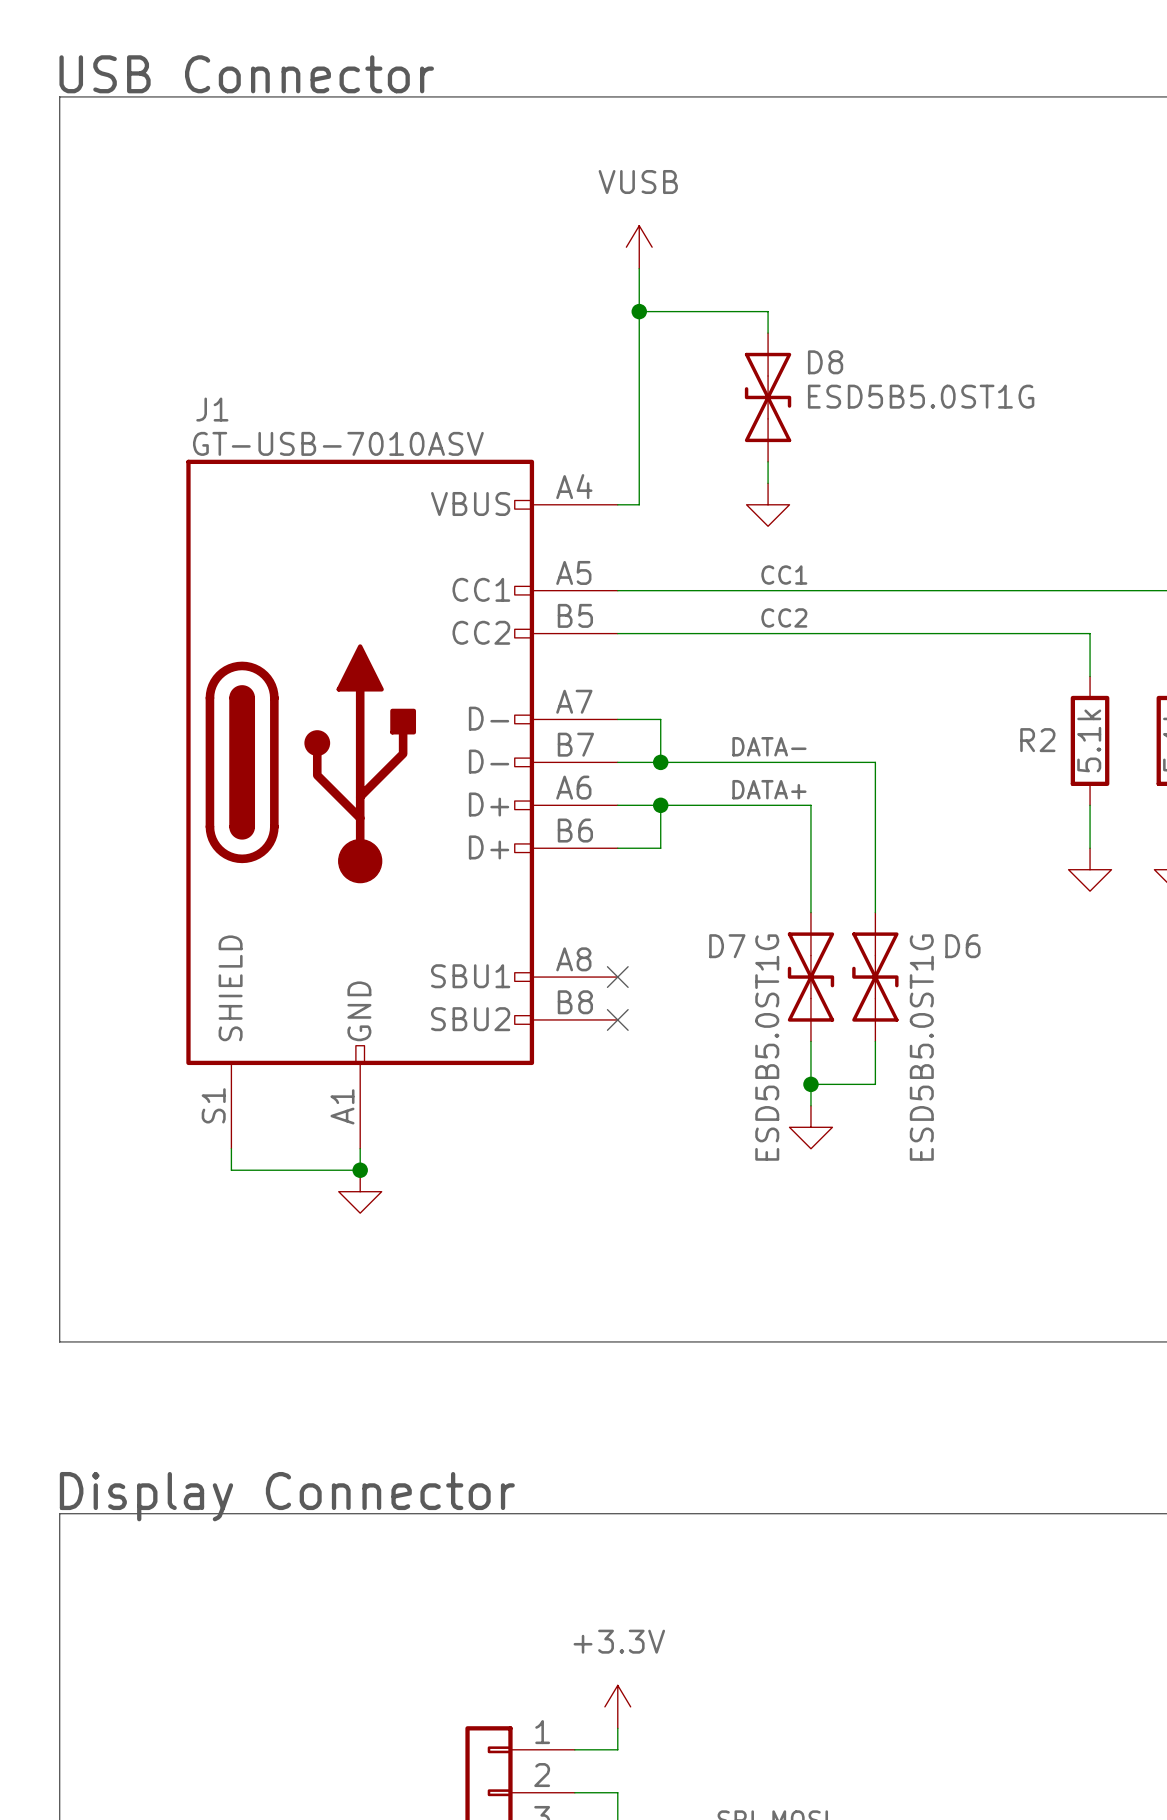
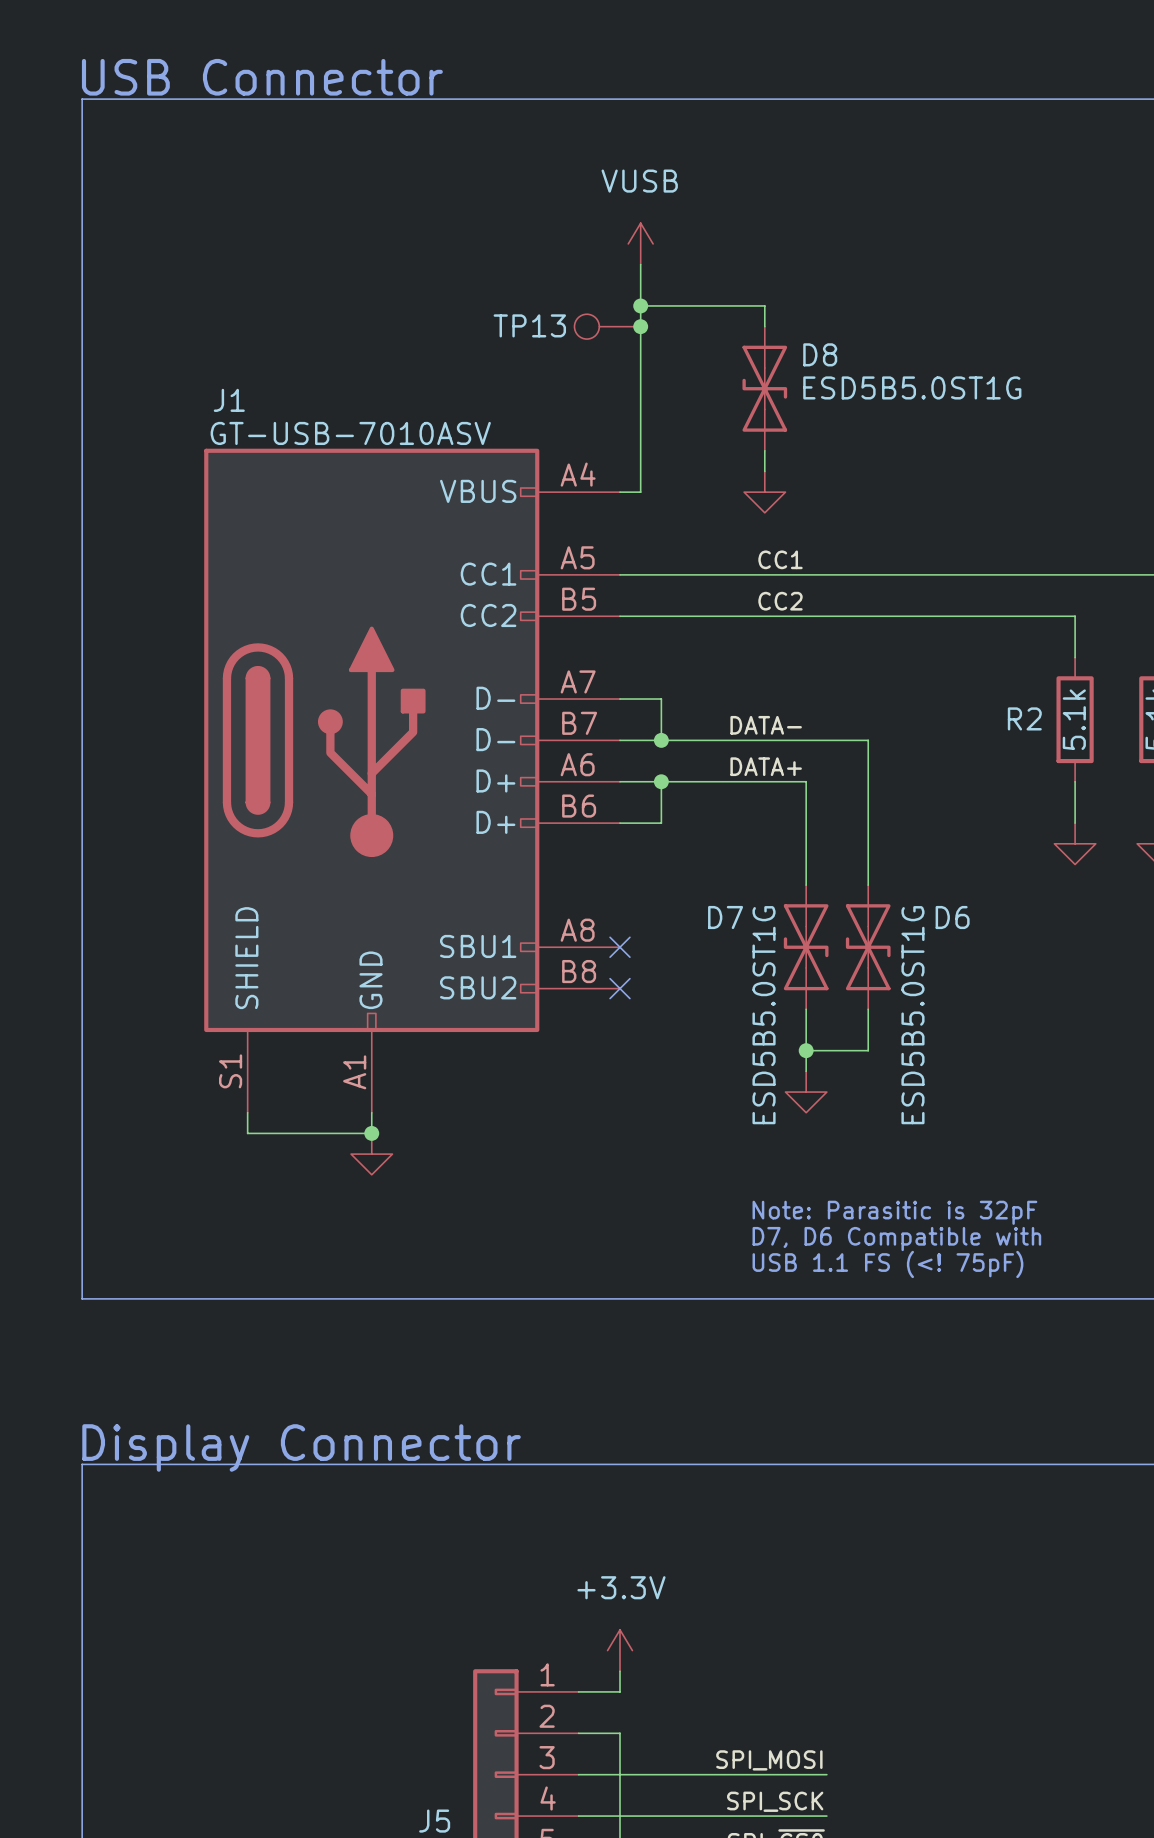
TP13: none -> (607, 326)
junction: none -> (640, 326)
text: none -> Note: Parasitic is 32pF (894, 1212)
text: none -> D7, D6 Compatible with (896, 1239)
text: none -> USB 1.1 FS (<! 75pF) (887, 1264)

